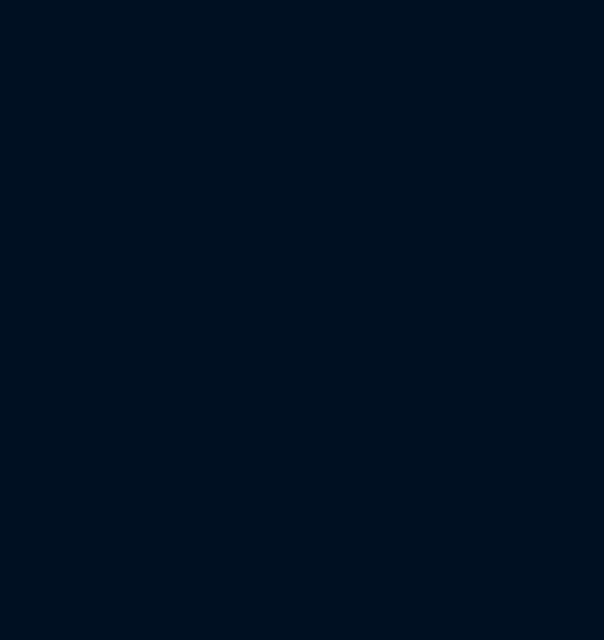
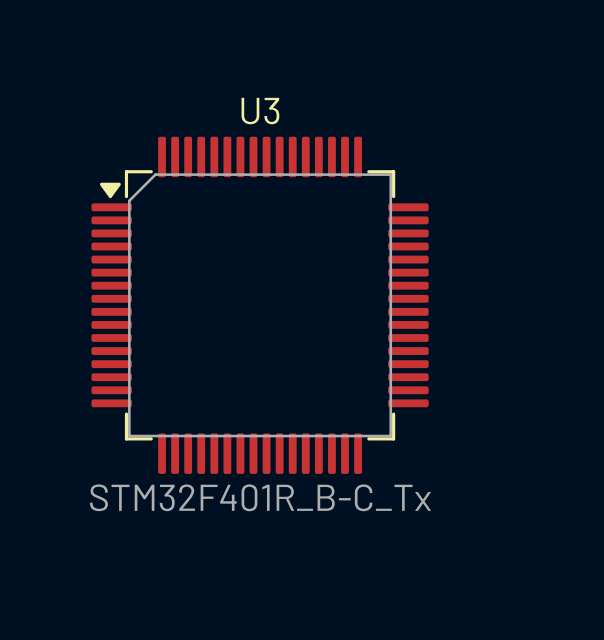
U3: none -> STM32F401R_B-C_Tx (260, 305)

